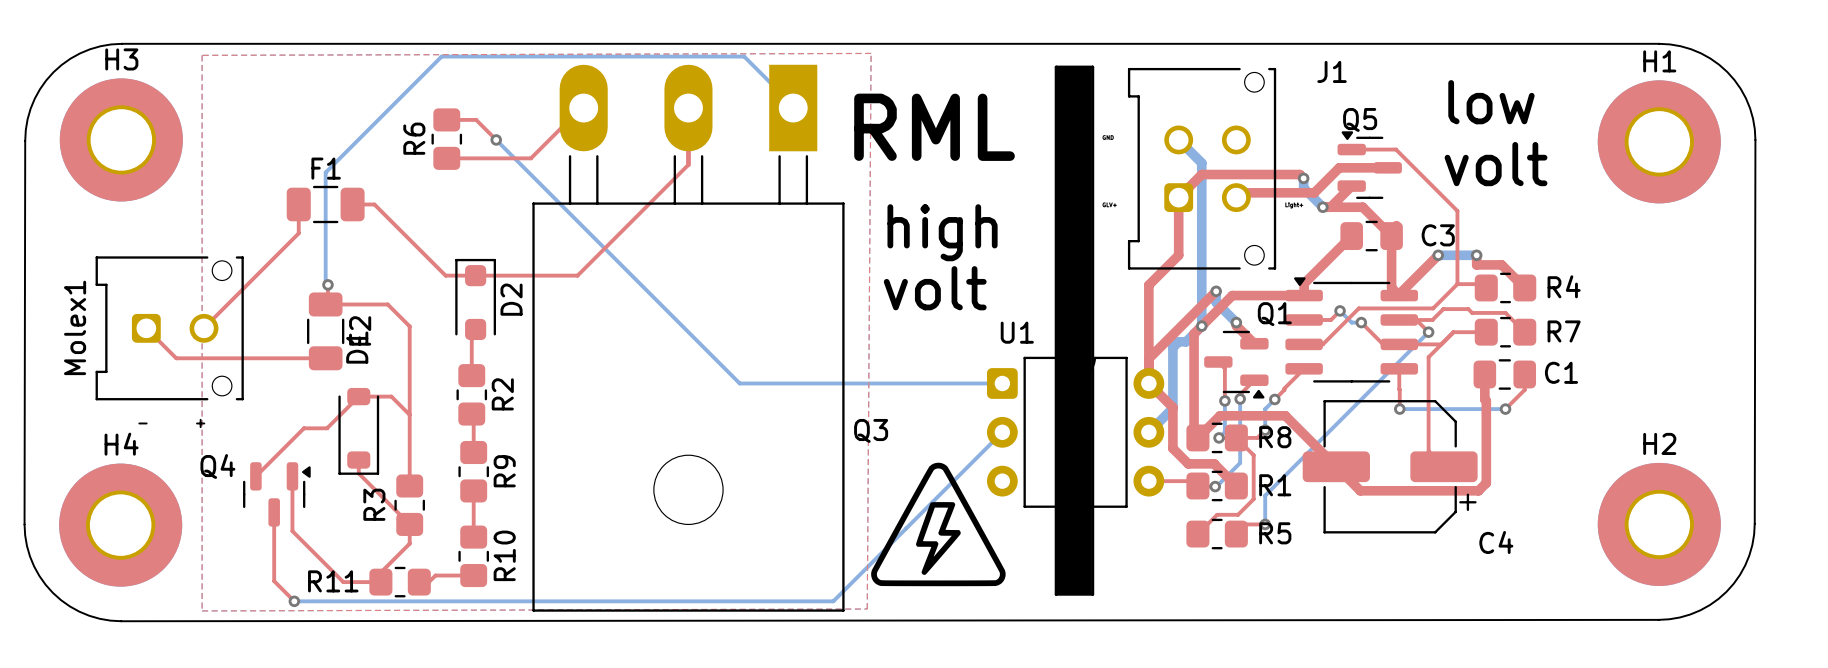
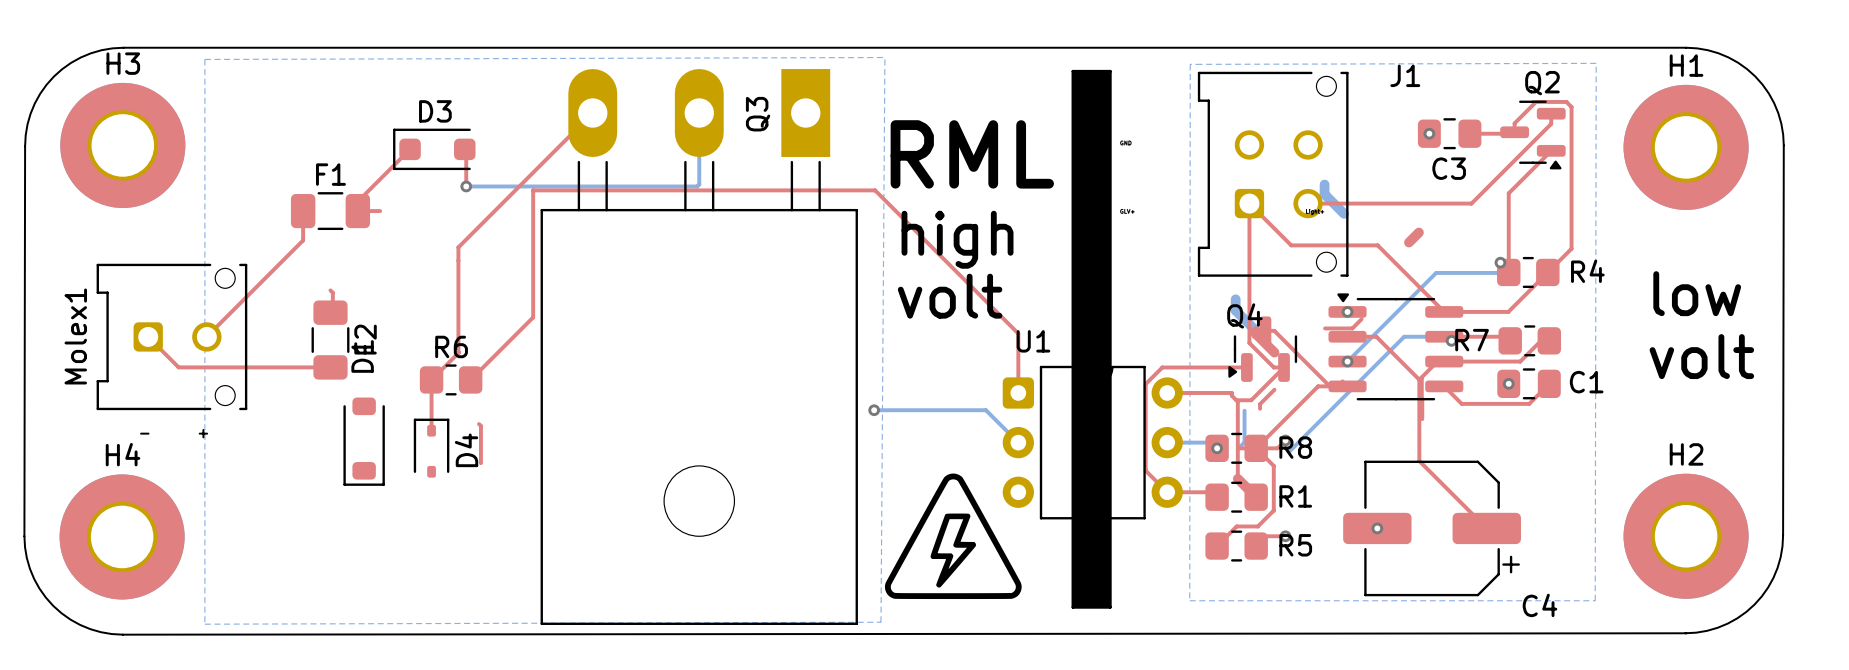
top zone outline: (871, 53) (867, 609) (202, 610) (202, 55) (871, 53) -> none
bottom zone outline: none -> (1596, 63) (1595, 600) (1189, 600) (1190, 64) (1596, 63)
text position: low (1491, 102) -> low (1697, 293)
top track: (583, 105) (530, 158) (446, 158) -> none
top track: (688, 105) (688, 164) (577, 275) (445, 275) (374, 204) -> none
bottom track: (793, 105) (744, 56) (441, 56) (325, 172) (325, 282) -> none
bottom track: none -> (699, 113) (699, 184) (697, 186) (466, 186)
top track: none -> (1551, 113) (1551, 123) (1471, 203) (1308, 203)
top track: none -> (592, 115) (592, 113) (458, 247) (458, 352) (431, 379) (431, 430)
top track: (446, 119) (476, 119) (496, 139) -> none
top track: none -> (1471, 132) (1469, 133) (1513, 133) (1514, 123) (1536, 101) (1566, 101) (1571, 107) (1571, 248) (1508, 311) (1444, 311)
text position: RML (934, 127) -> RML (972, 154)
via: none -> (1429, 133)
Q2: none -> (1532, 134)
R6 rotation: 0° (446, 139) -> 90° clockwise (451, 379)
R6 position: (446, 139) -> (451, 379)
bottom track: (496, 139) (739, 383) (1002, 383) -> none
via position: (496, 139) -> (466, 186)
bottom track: (1178, 139) (1201, 163) (1201, 326) (1186, 341) (1178, 341) (1172, 347) (1172, 408) (1148, 432) -> (1217, 448) (1211, 442) (1167, 442)
top track: none -> (410, 149) (357, 203)
D3: none -> (434, 149)
top track: none -> (464, 149) (466, 186)
top track: none -> (1551, 150) (1508, 193) (1508, 272)
top track: (1351, 149) (1396, 149) (1457, 210) (1457, 284) -> none
text position: volt (1496, 164) -> volt (1701, 356)
Q5: (1369, 165) -> none
top track: (1387, 167) (1339, 167) (1314, 192) (1241, 192) (1236, 197) -> none
J1 position: (1202, 168) -> (1273, 174)
top track: (1303, 178) (1299, 174) (1201, 174) (1178, 197) (1178, 255) (1148, 285) (1148, 383) (1172, 407) (1172, 448) (1188, 463) (1214, 463) (1218, 467) -> (1167, 392) (1231, 392) (1231, 395) (1237, 401) (1237, 478)
via: (1303, 178) -> none
top track: (1351, 186) (1330, 207) -> none
top track: (1322, 207) (1362, 207) (1391, 236) (1391, 287) (1399, 295) (1438, 255) -> none
via: (1322, 207) -> none
C3 name position: C3 (1438, 235) -> C3 (1449, 168)
top track: (1351, 236) (1304, 283) (1304, 295) (1232, 295) (1194, 333) (1194, 434) (1197, 437) (1220, 415) (1285, 415) (1360, 490) (1478, 490) (1486, 483) (1484, 374) -> none
C3 position: (1371, 236) -> (1449, 133)
bottom track: (1438, 255) (1476, 255) -> none
via: (1438, 255) -> none
top track: (1476, 255) (1476, 264) (1501, 264) (1524, 287) -> none
bottom track: none -> (1506, 272) (1436, 272) (1347, 361)
via: (327, 284) -> none
top track: (1457, 284) (1482, 284) (1486, 287) -> none
top track: (1457, 284) (1433, 308) (1358, 308) (1322, 344) (1304, 344) -> none
R4 position: (1505, 287) -> (1528, 272)
top track: (1216, 291) (1148, 358) -> none
via: (1216, 291) -> none
D2: (475, 299) -> none
top track: none -> (1444, 311) (1377, 245) (1291, 245) (1249, 203) (1249, 343) (1273, 367) (1284, 367) (1251, 400) (1236, 400)
top track: (325, 304) (387, 304) (409, 326) (409, 485) -> none
bottom track: (1340, 310) (1351, 322) (1361, 322) -> none
via position: (1340, 310) -> (1347, 311)
top track: (1399, 319) (1432, 319) (1443, 309) (1468, 309) (1472, 312) (1505, 312) (1524, 332) -> none
top track: (1416, 319) (1428, 332) -> none
via: (1236, 322) -> none
top track: none -> (1265, 330) (1274, 330) (1329, 386)
top track: (1361, 322) (1383, 344) (1441, 344) -> none
via: (1361, 322) -> none
top track: none -> (1510, 332) (1506, 336) (1444, 336)
top track: none -> (1549, 332) (1520, 361) (1437, 361) (1419, 379)
via: (1201, 326) -> none
top track: none -> (1347, 336) (1376, 336) (1419, 379)
bottom track: none -> (1444, 336) (1404, 336) (1289, 451)
top track: (475, 329) (471, 333) (471, 375) -> none
part position: (1351, 329) -> (1395, 346)
R7 name position: R7 (1564, 331) -> R7 (1472, 340)
bottom track: (1428, 332) (1265, 495) (1265, 524) -> none
top track: (1486, 332) (1453, 332) (1428, 357) (1428, 451) (1443, 466) -> none
via: none -> (1347, 361)
top track: none -> (1246, 367) (1162, 367) (1145, 384) (1145, 470) (1167, 492)
top track: (1218, 361) (1224, 368) (1224, 400) -> none
Q1: (1236, 364) -> none
top track: (1304, 368) (1284, 389) -> (1342, 381) (1347, 386) (1318, 386) (1305, 399)
top track: none -> (470, 379) (533, 317) (533, 190) (875, 190) (1018, 333) (1018, 392)
top track: none -> (1419, 379) (1419, 461) (1486, 528)
top track: (1524, 374) (1524, 389) (1505, 409) -> (1549, 383) (1529, 403) (1461, 403) (1444, 386)
R2: (471, 394) -> none
bottom track: (1240, 398) (1240, 462) (1215, 486) -> none
via: (1240, 398) -> none
top track: none -> (1295, 409) (1256, 448)
bottom track: (1274, 399) (1265, 409) (1265, 430) -> none
via: (1274, 399) -> none
via: none -> (874, 410)
via: (1224, 400) -> none
bottom track: (1399, 409) (1505, 409) -> none
via: (1399, 409) -> none
via position: (1505, 409) -> (1508, 383)
top track: (409, 414) (391, 396) (358, 396) (327, 428) (303, 428) (255, 476) -> none
Q3 name rotation: 0° (871, 430) -> 90° counterclockwise (758, 114)
Q3 name position: Q3 (871, 430) -> Q3 (758, 114)
bottom track: (1002, 432) (833, 601) (294, 601) -> (1018, 442) (985, 410) (874, 410)
D4: none -> (431, 448)
via position: (1219, 437) -> (1217, 448)
top track: (358, 460) (358, 473) (409, 524) (409, 543) (380, 572) (380, 582) (343, 582) (292, 531) (292, 476) -> none
Q4 name position: Q4 (217, 466) -> Q4 (1244, 315)
C4 position: (1390, 466) -> (1432, 528)
R9: (473, 471) -> none
via: (1215, 486) -> none
top track: (473, 490) (473, 537) -> none
Q4 rotation: 0° (276, 494) -> 180° (1262, 349)
Q4 position: (276, 494) -> (1262, 349)
R3: (409, 505) -> none
top track: (274, 512) (274, 581) (294, 601) -> none
via: none -> (1377, 528)
R10: (473, 556) -> none
top track: (473, 575) (435, 575) (428, 582) (419, 582) -> none
R11: (400, 582) -> none
via: (294, 601) -> none

